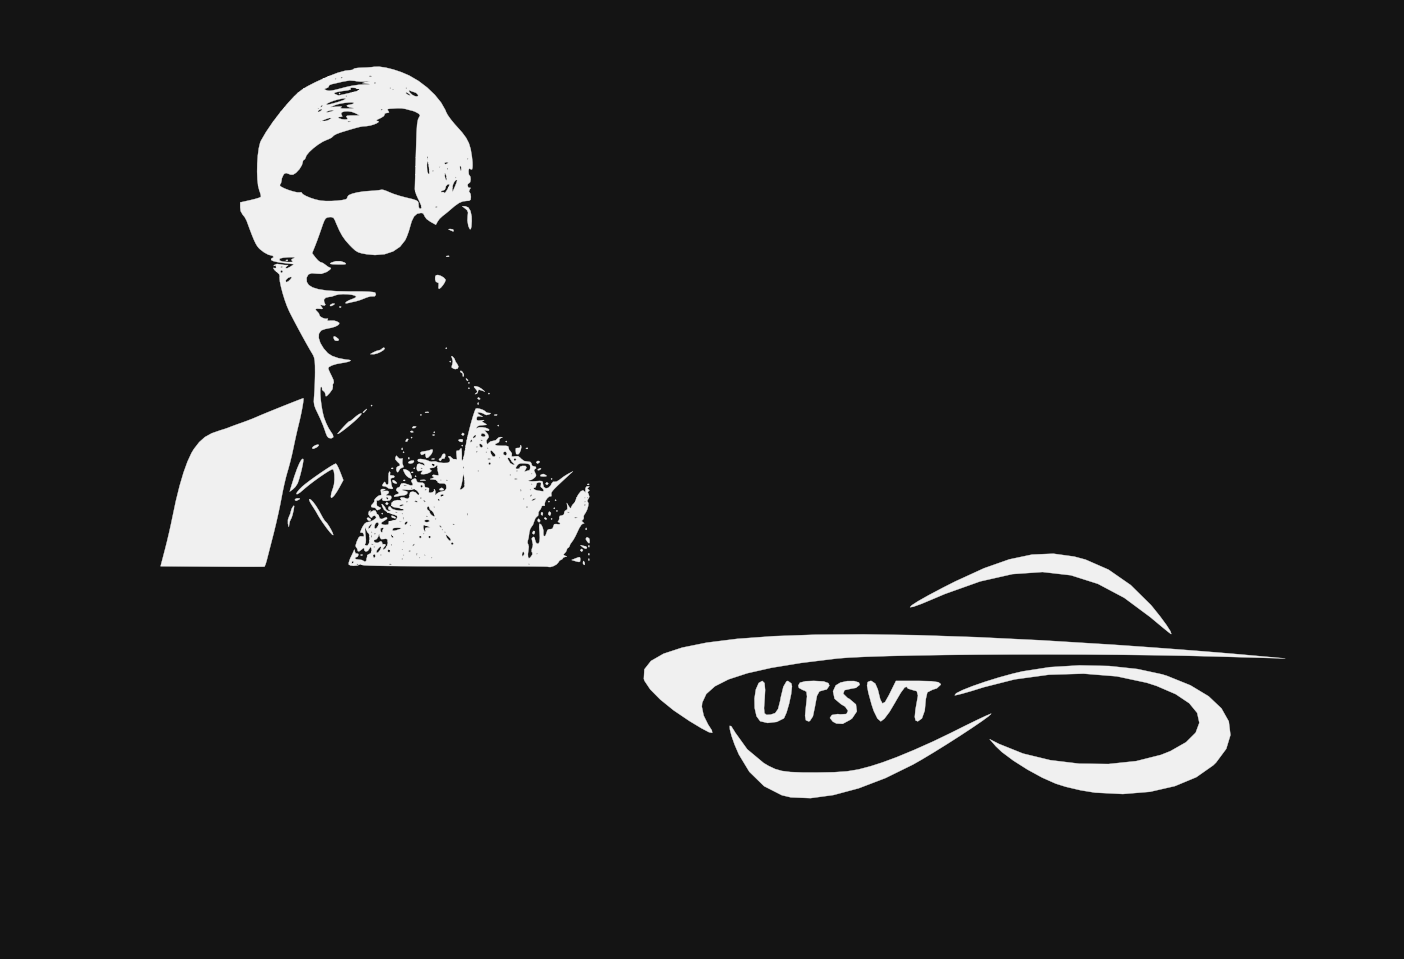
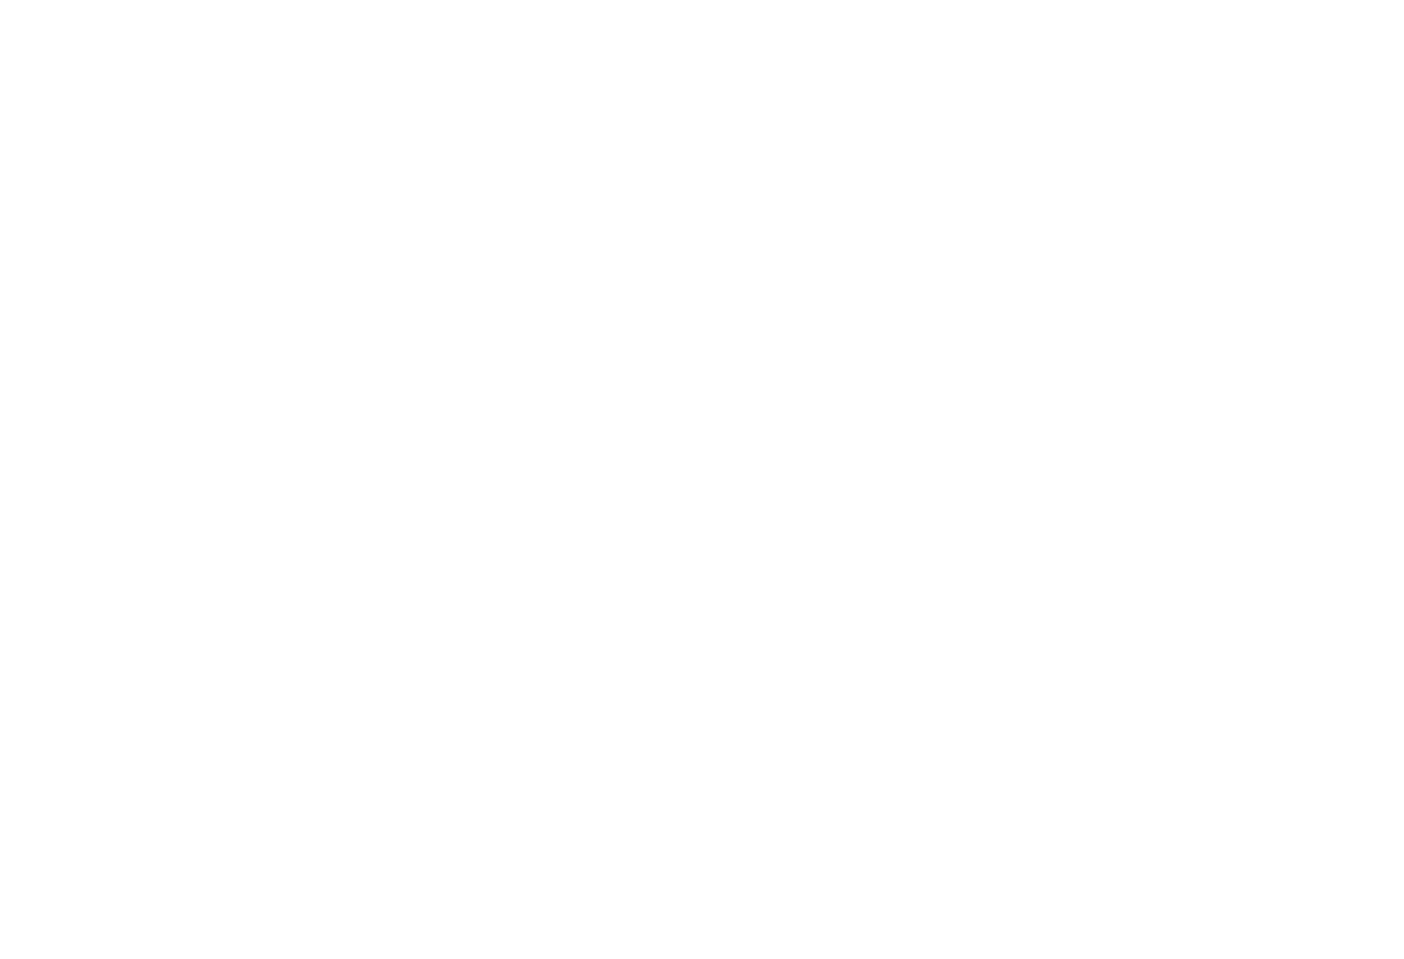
drawing: [160, 66, 590, 568] -> none
drawing: [643, 553, 1286, 799] -> none

